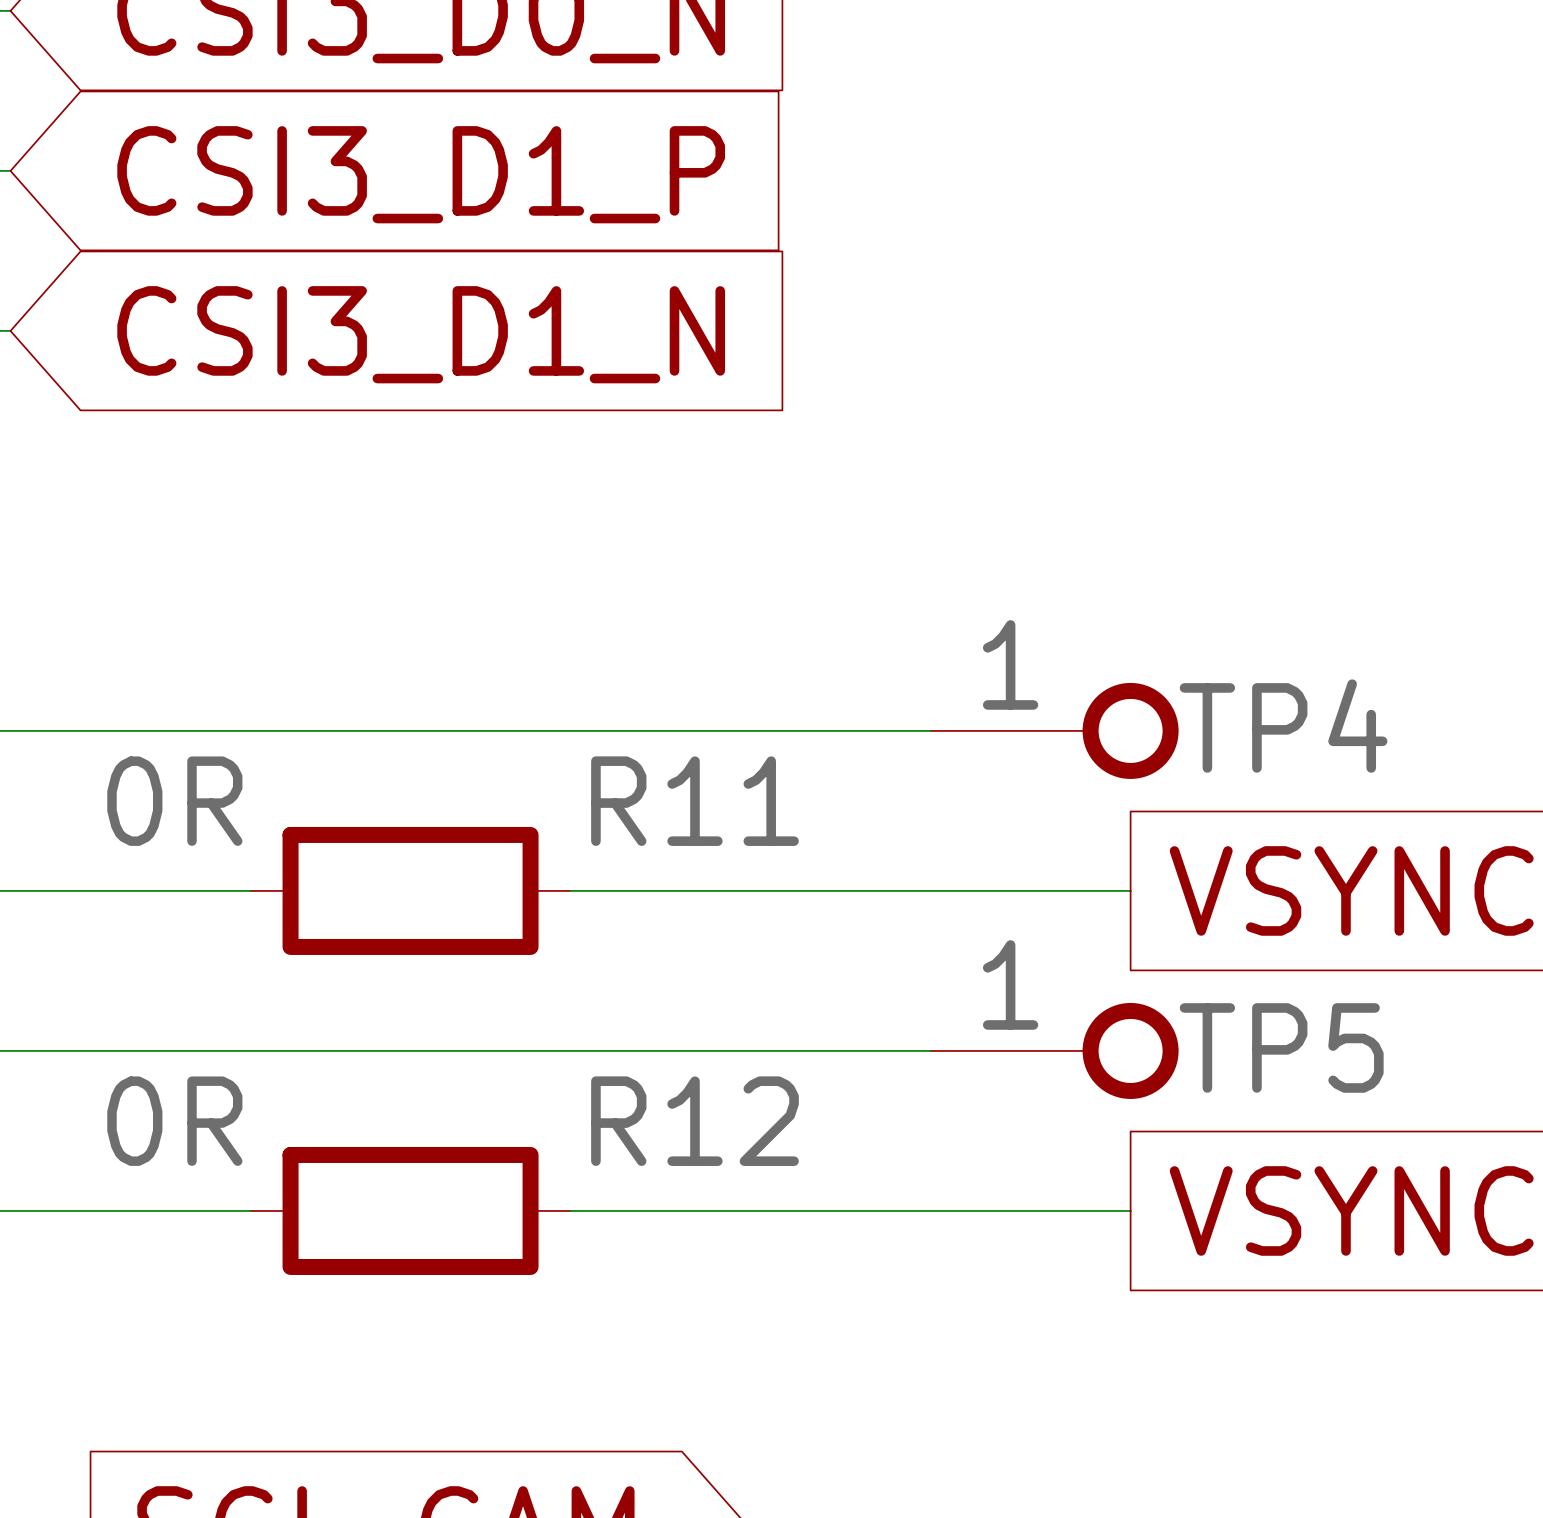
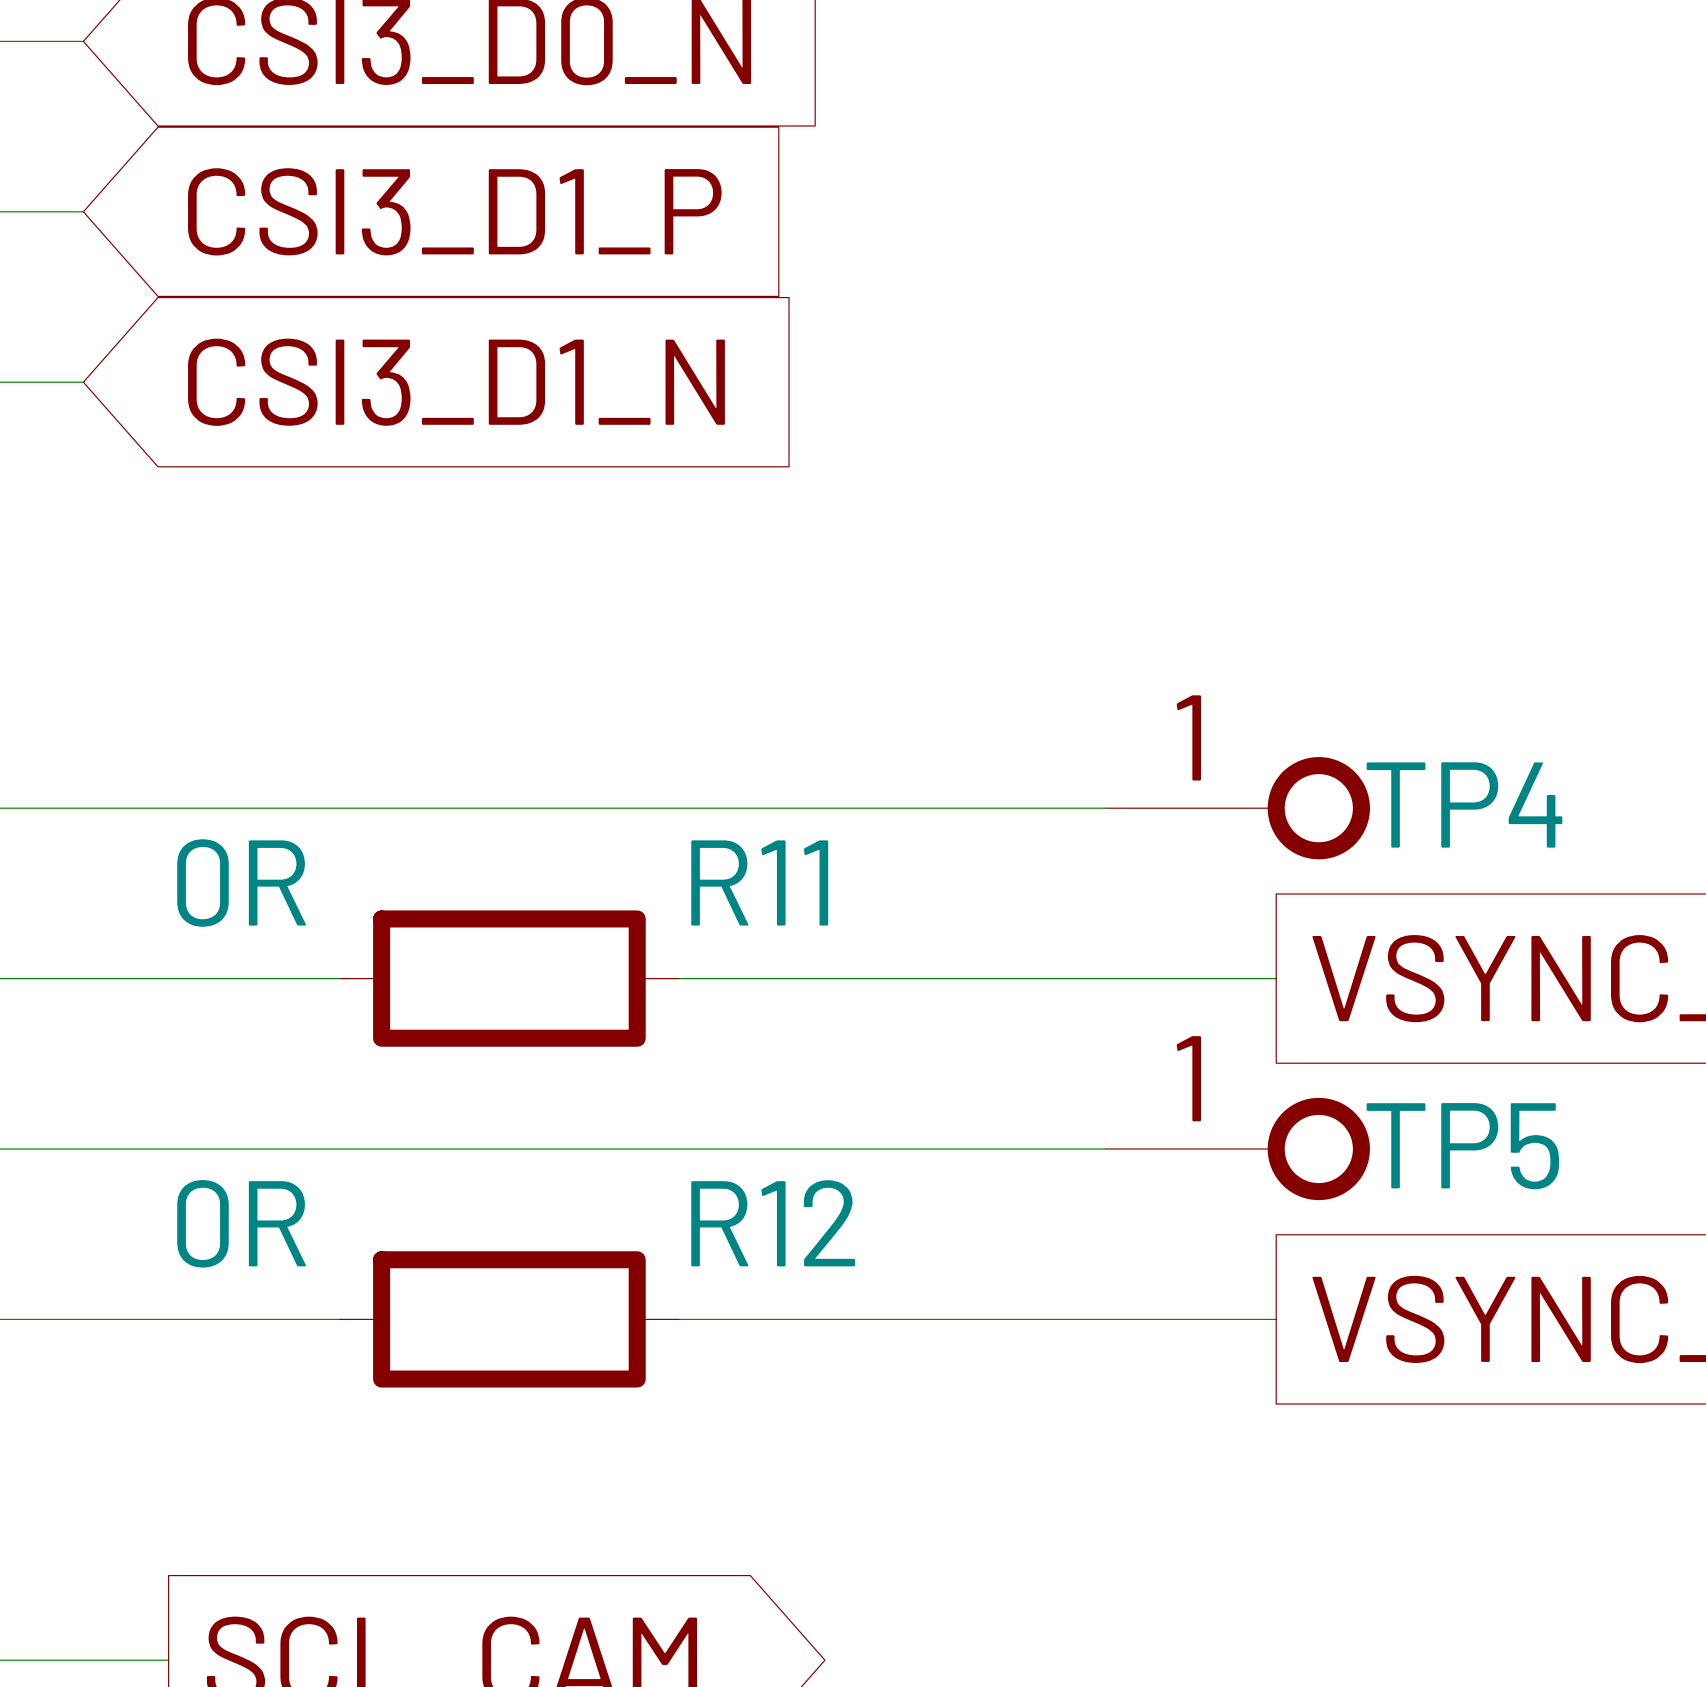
TP4 position: (1054, 730) -> (1237, 808)
TP5 position: (1054, 1050) -> (1237, 1149)

